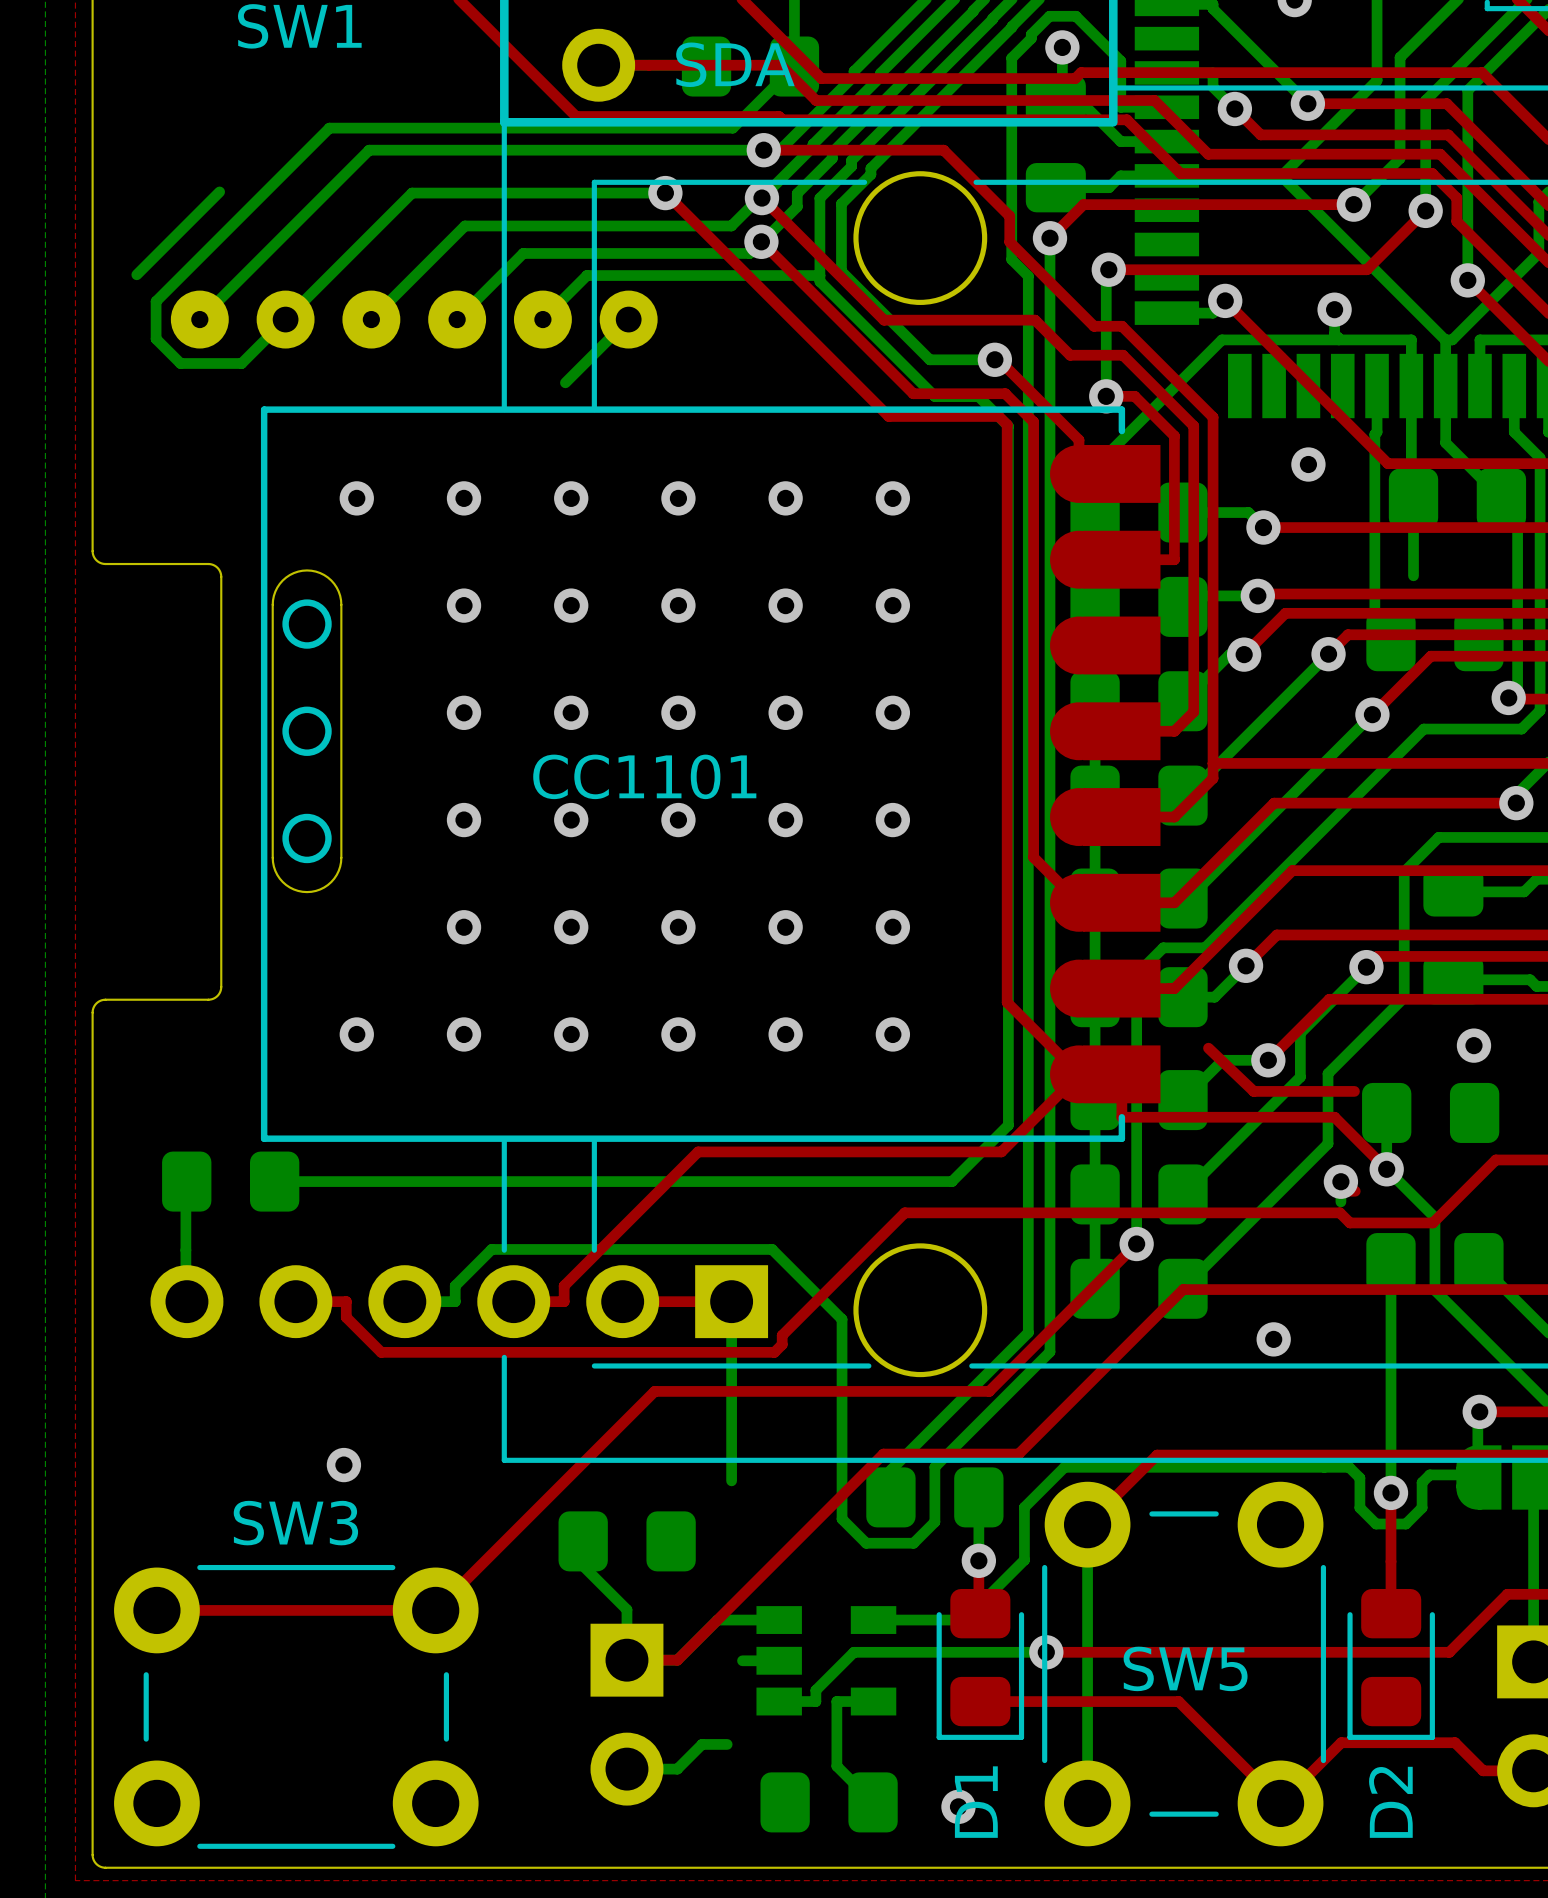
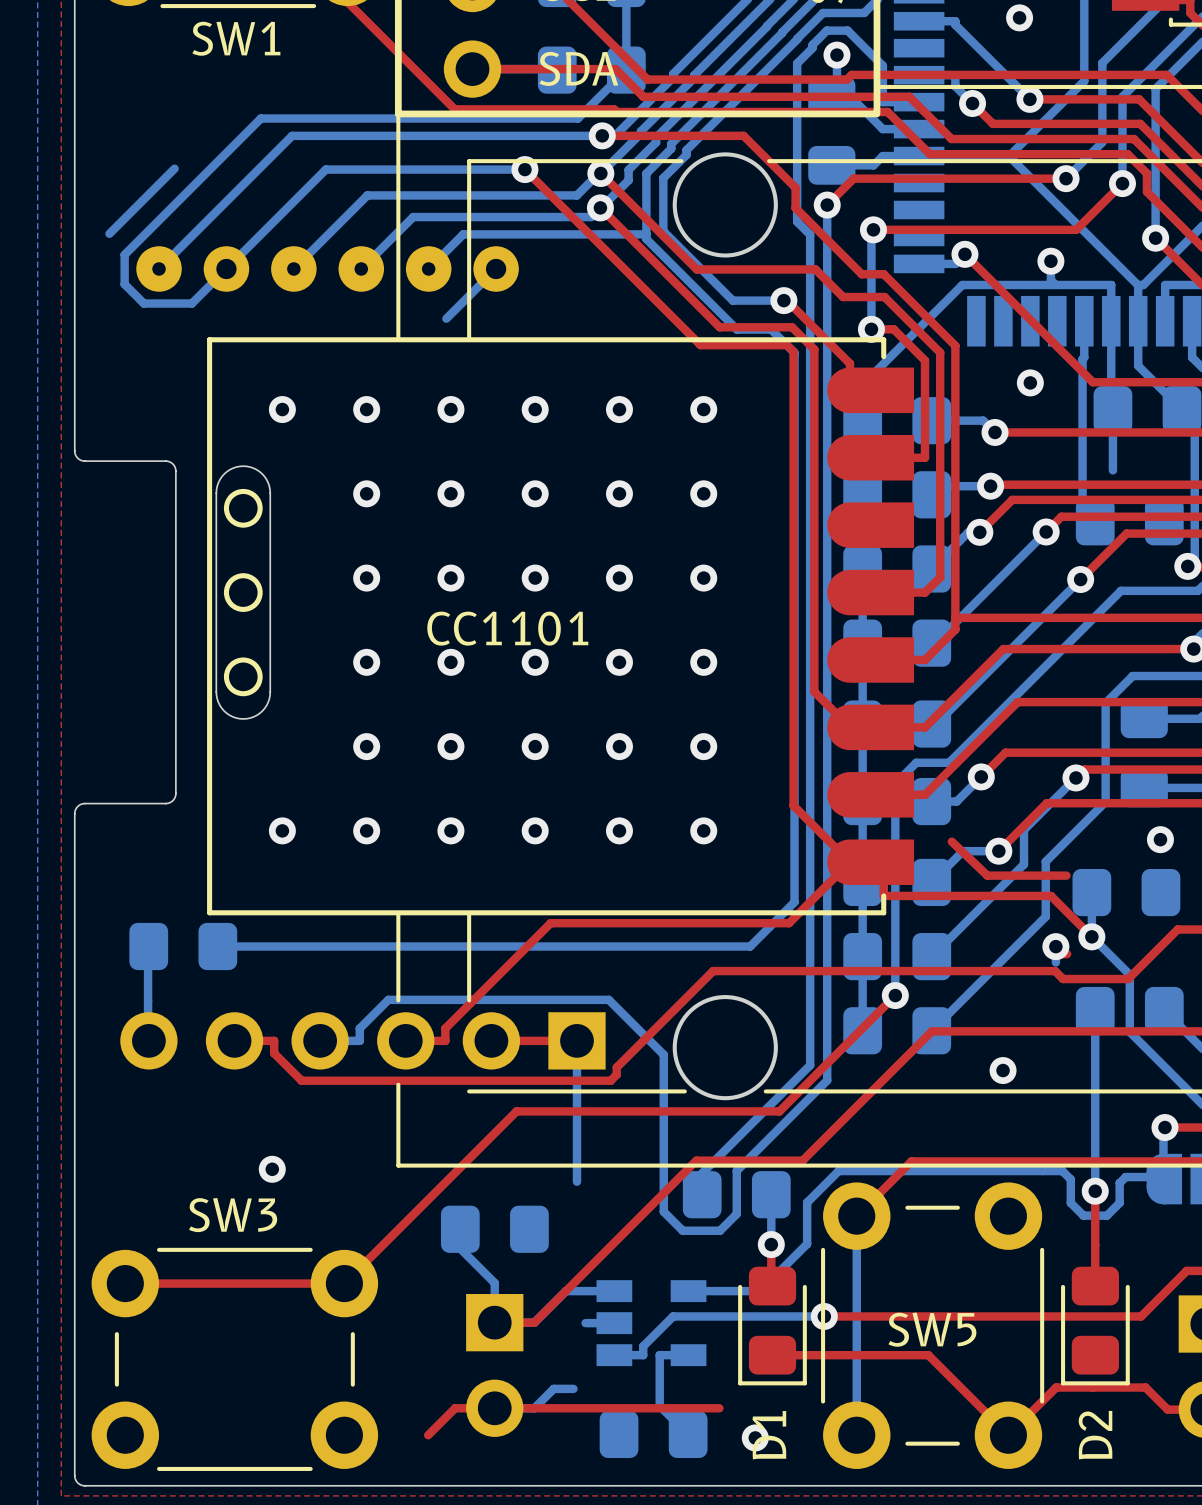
top track: none -> (719, 1408) (455, 1408) (428, 1435)

